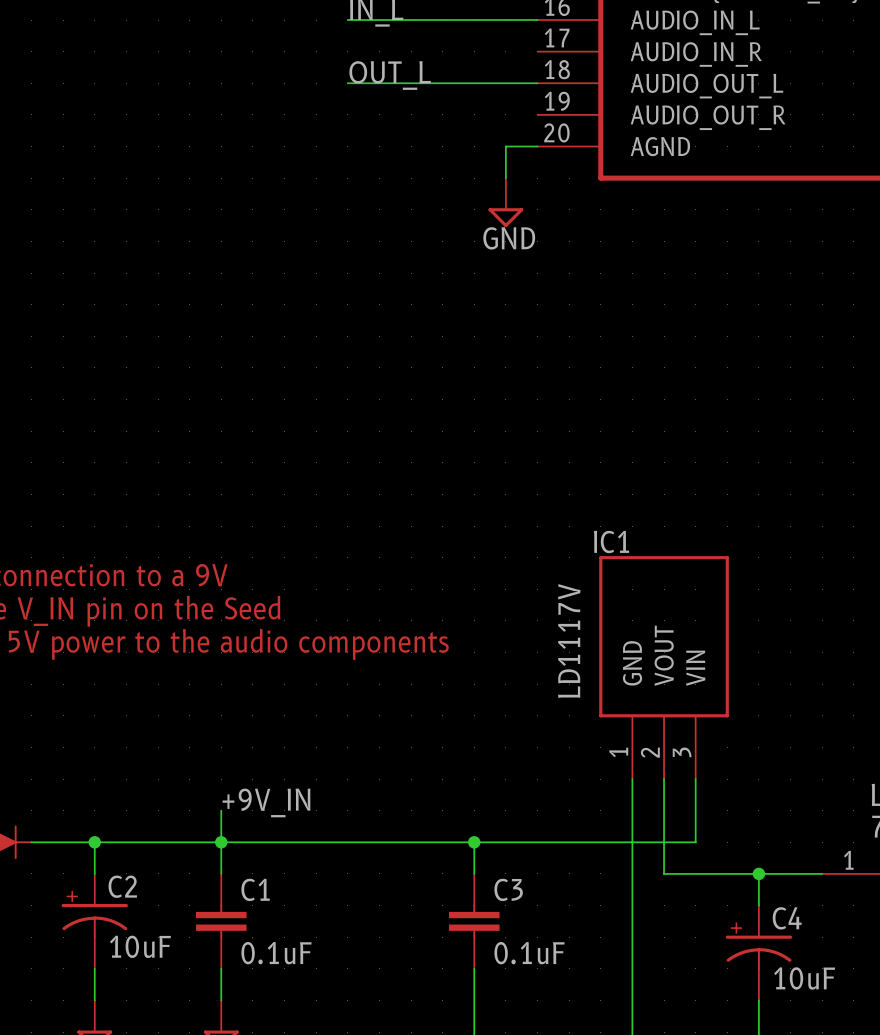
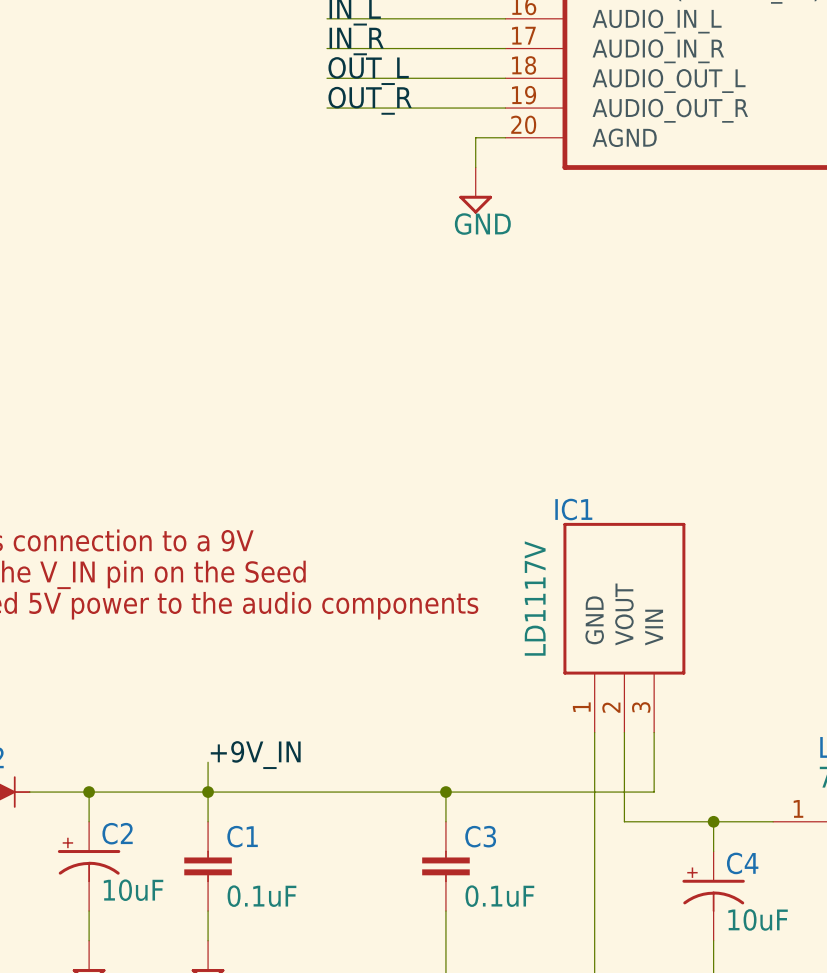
label: none -> IN_R (356, 41)
wire: none -> (327, 48) (505, 48)
label: none -> OUT_R (370, 100)
wire: none -> (327, 108) (505, 108)

